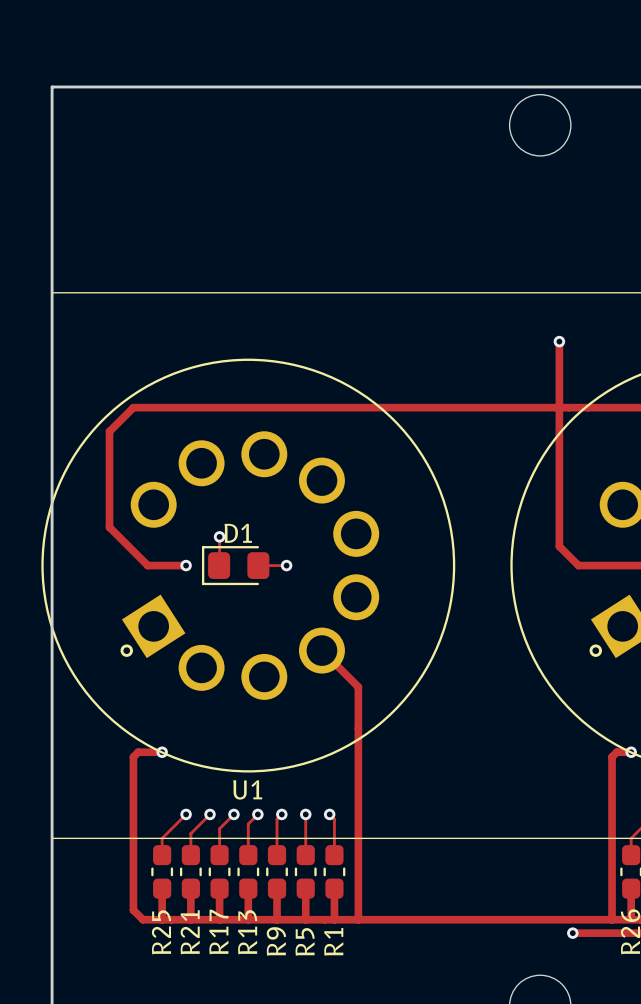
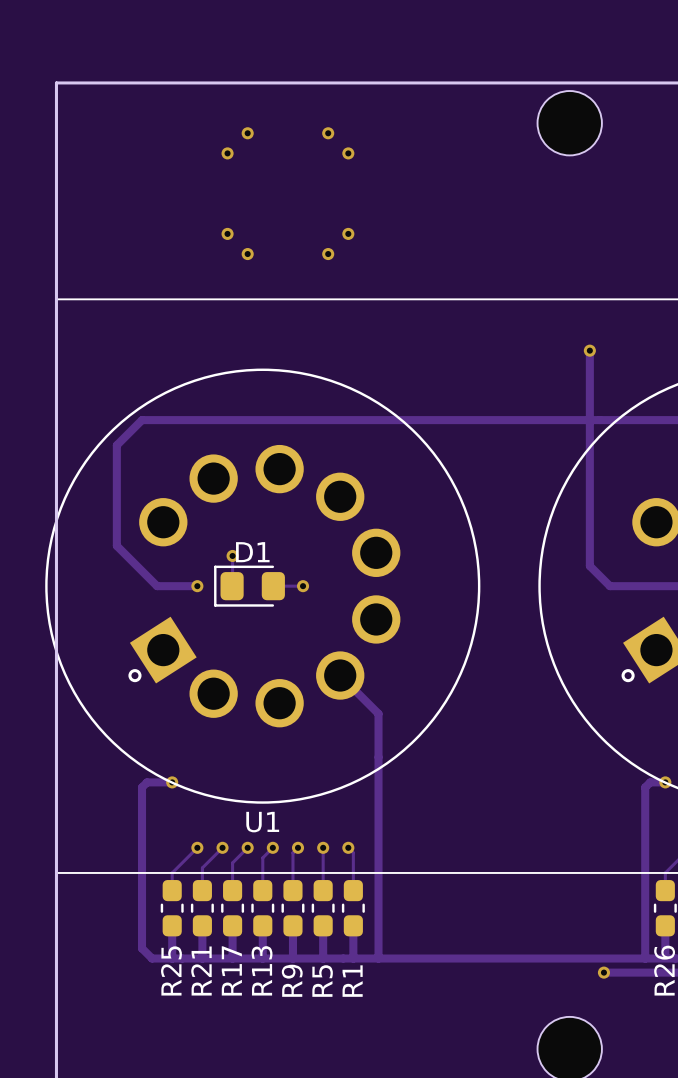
via: none -> (247, 133)
via: none -> (328, 133)
via: none -> (227, 153)
via: none -> (348, 153)
via: none -> (227, 233)
via: none -> (348, 233)
via: none -> (247, 254)
via: none -> (328, 254)

